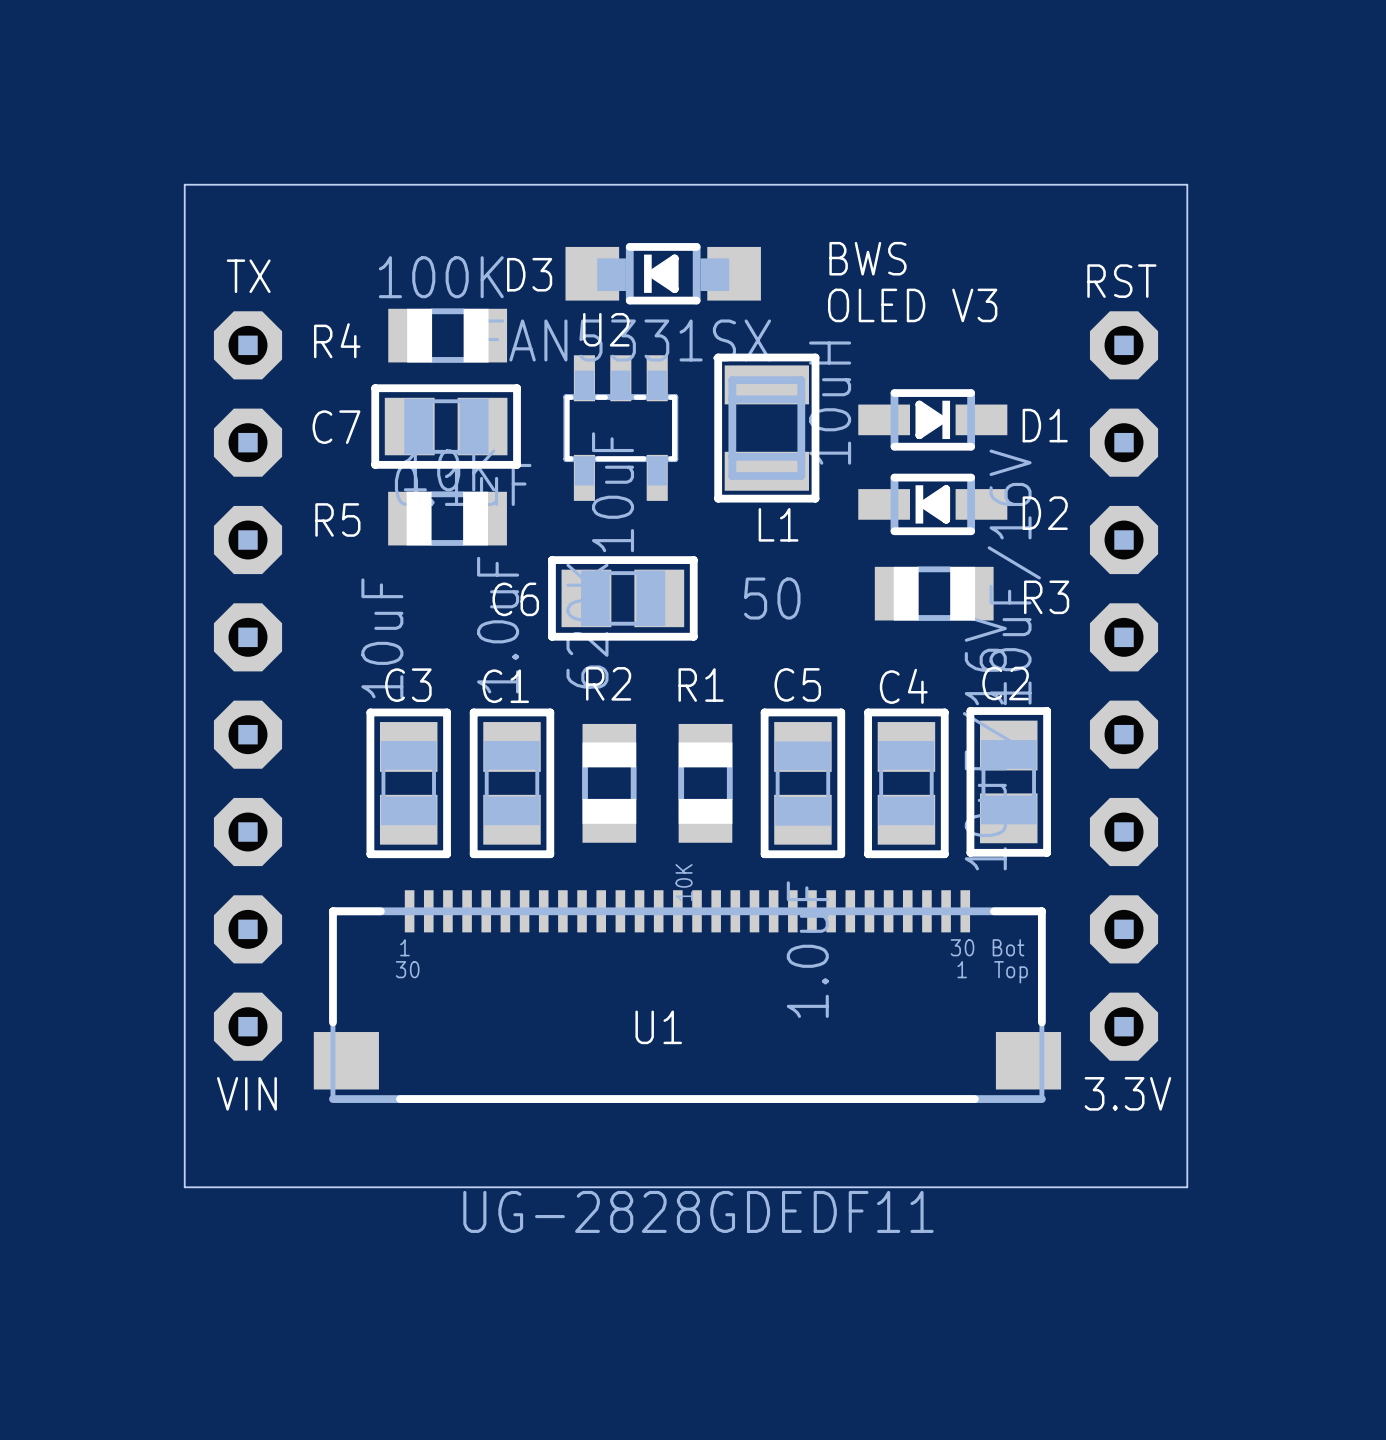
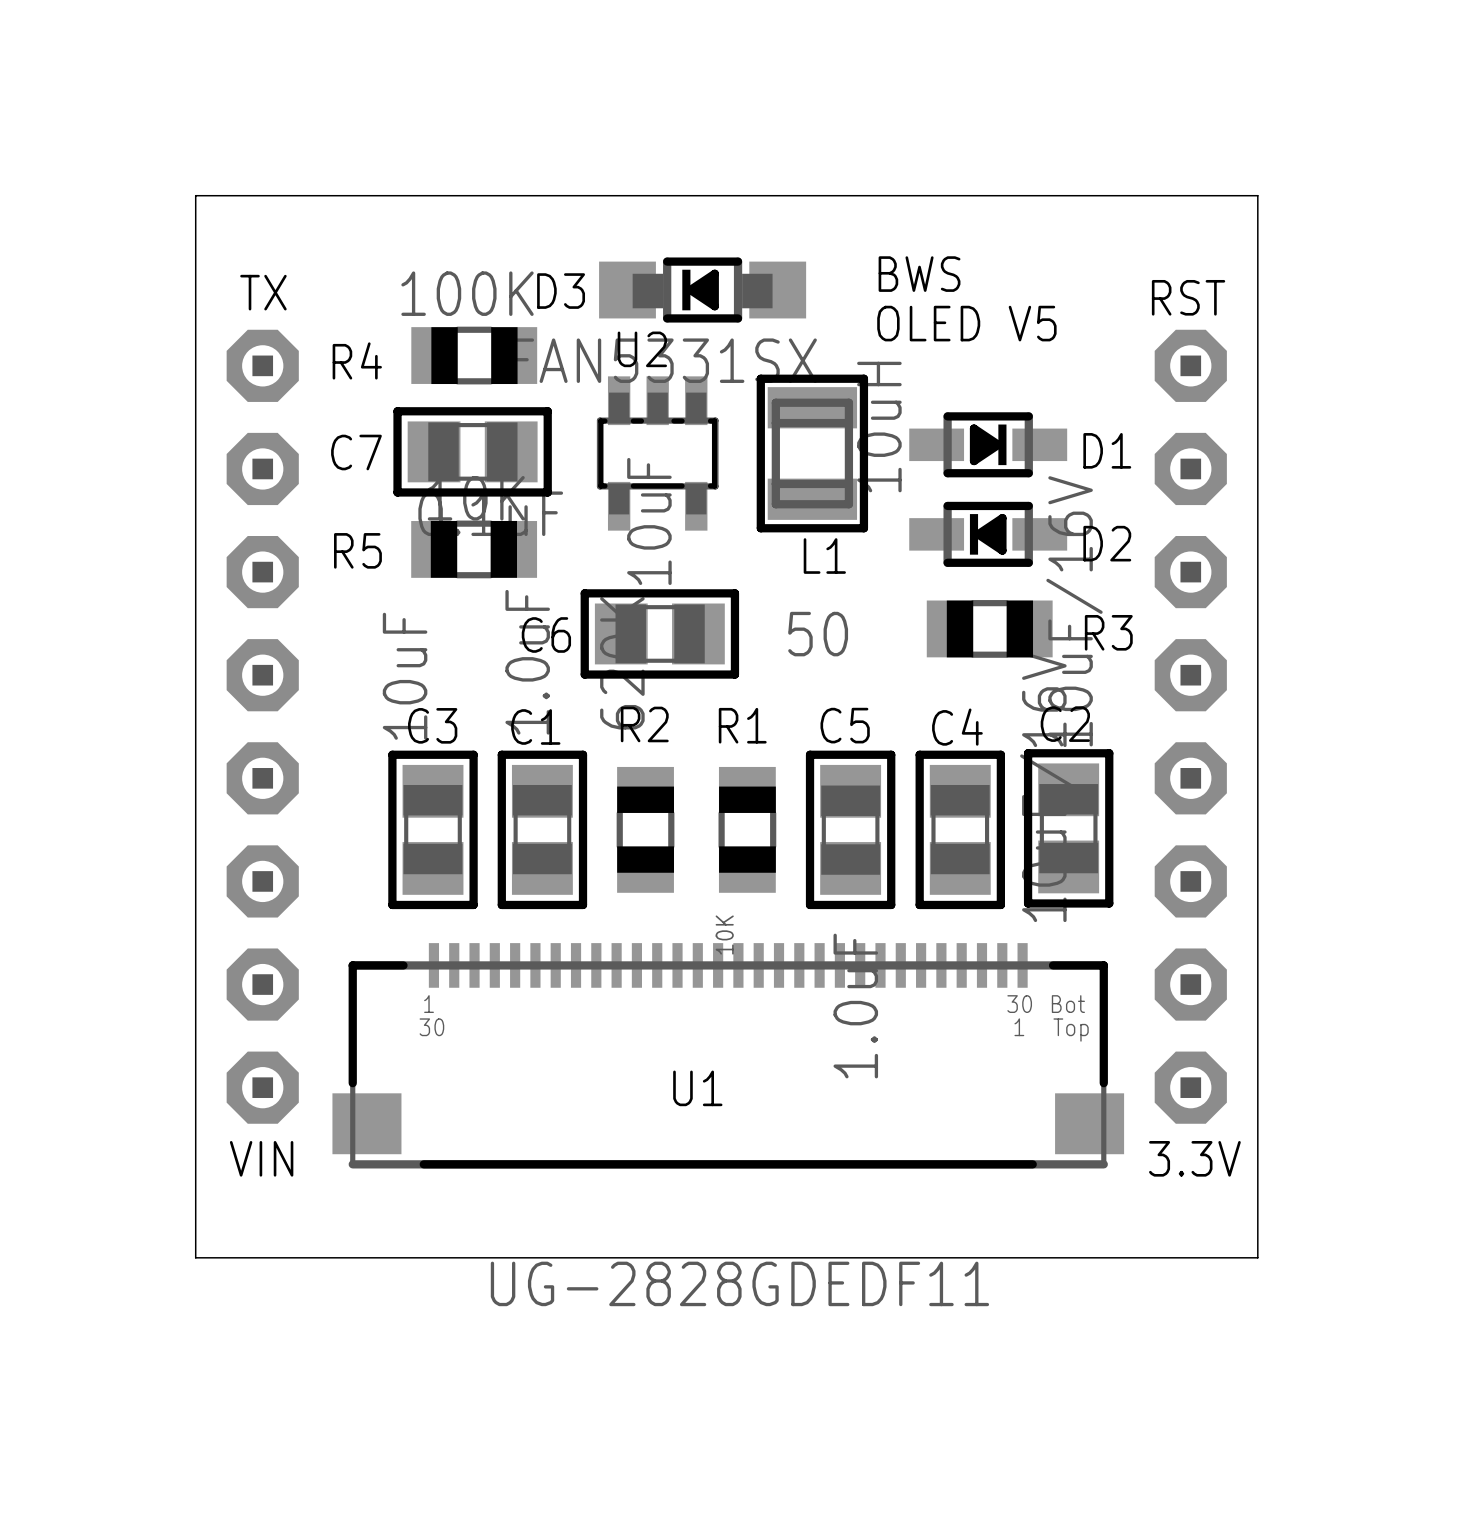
text: OLED V3 (912, 305) -> OLED V5 (966, 323)

